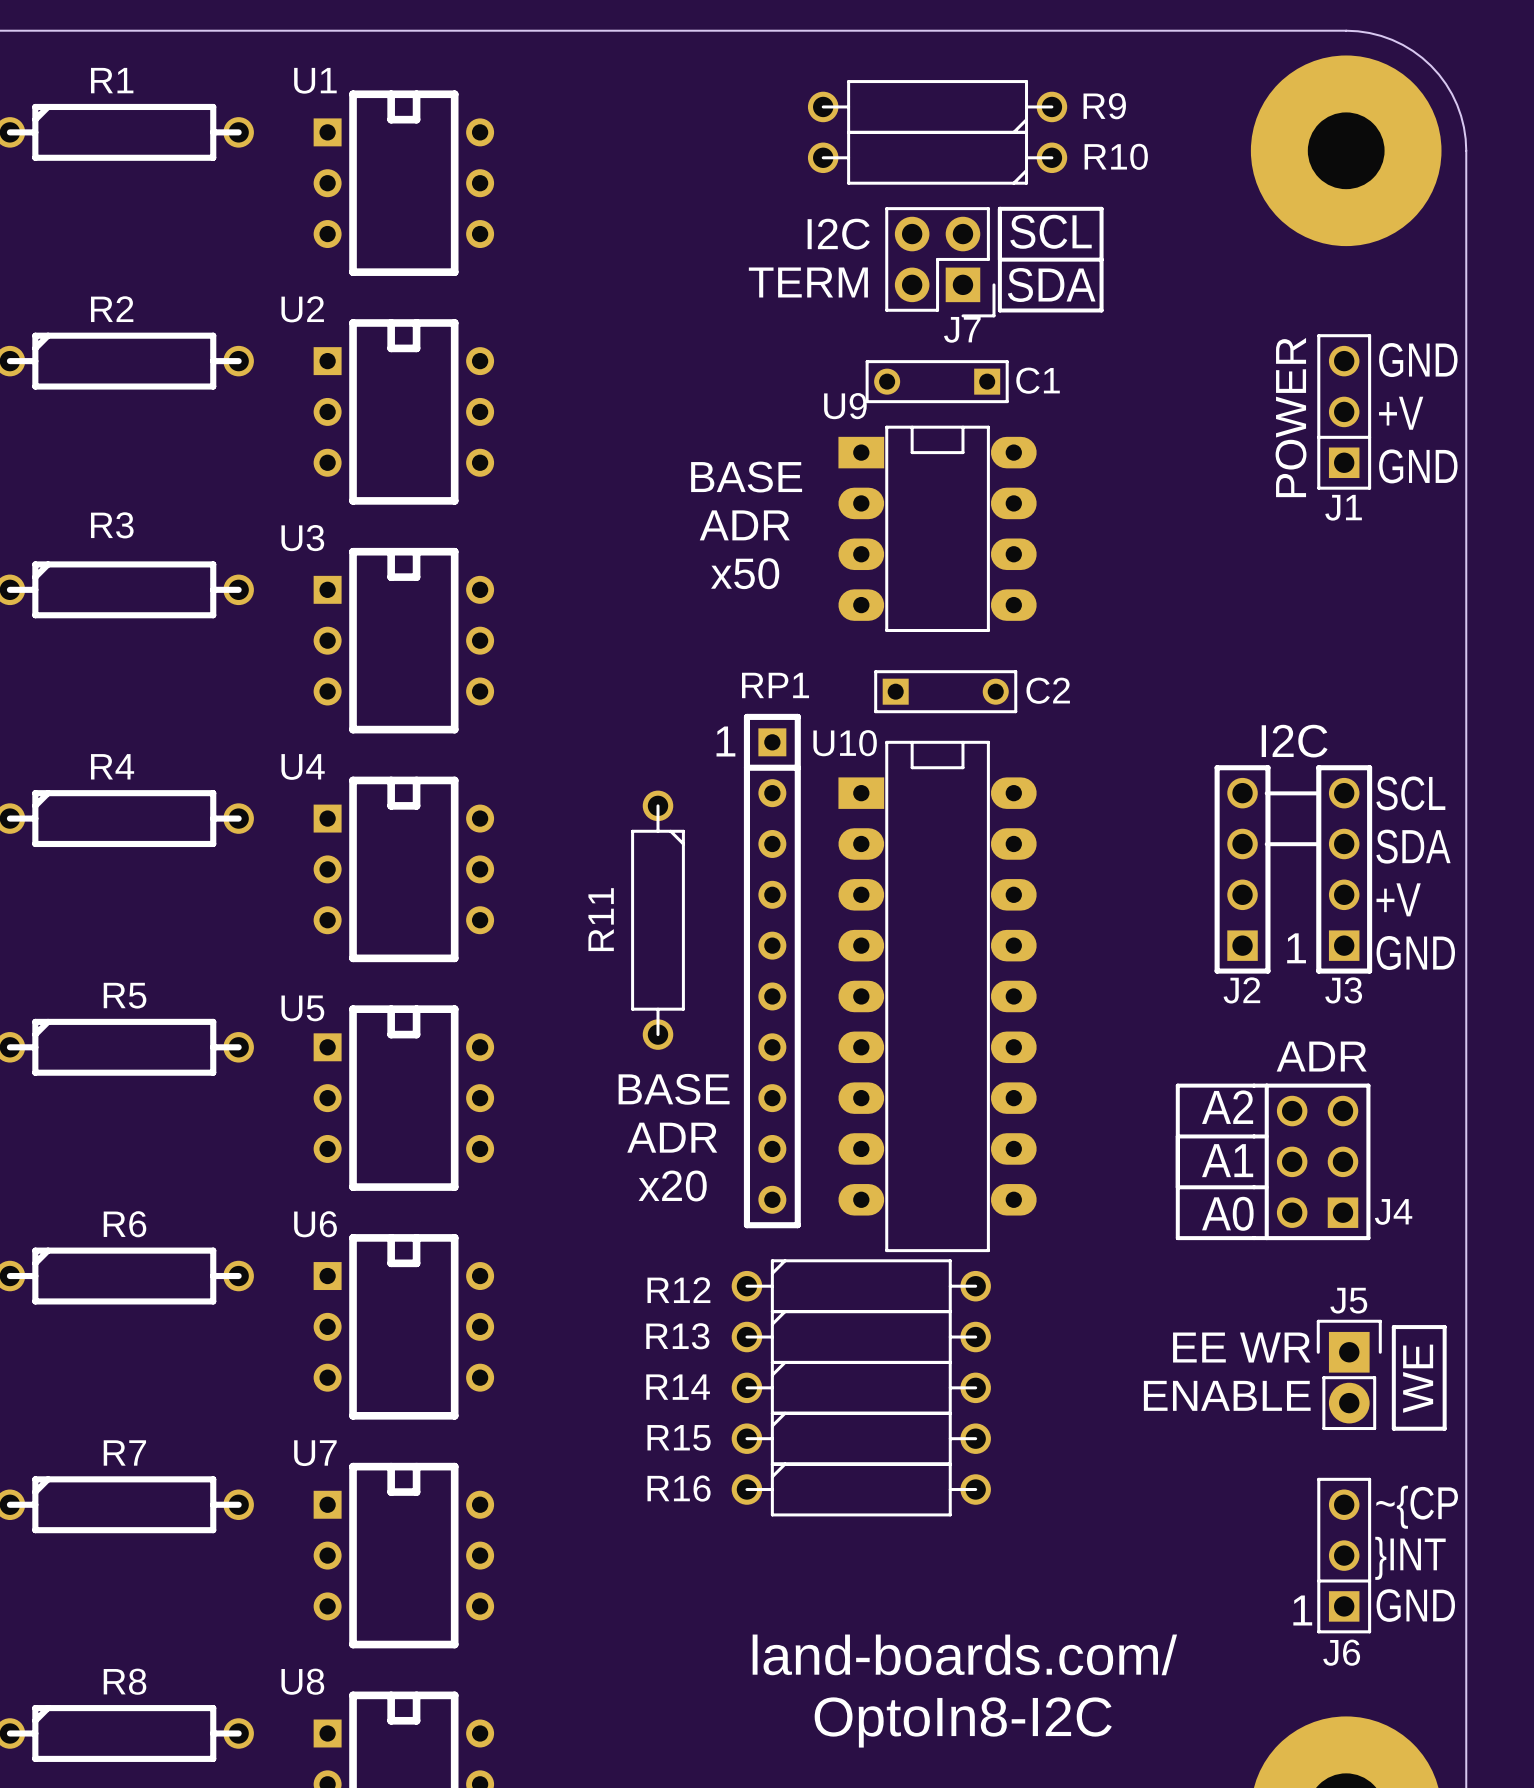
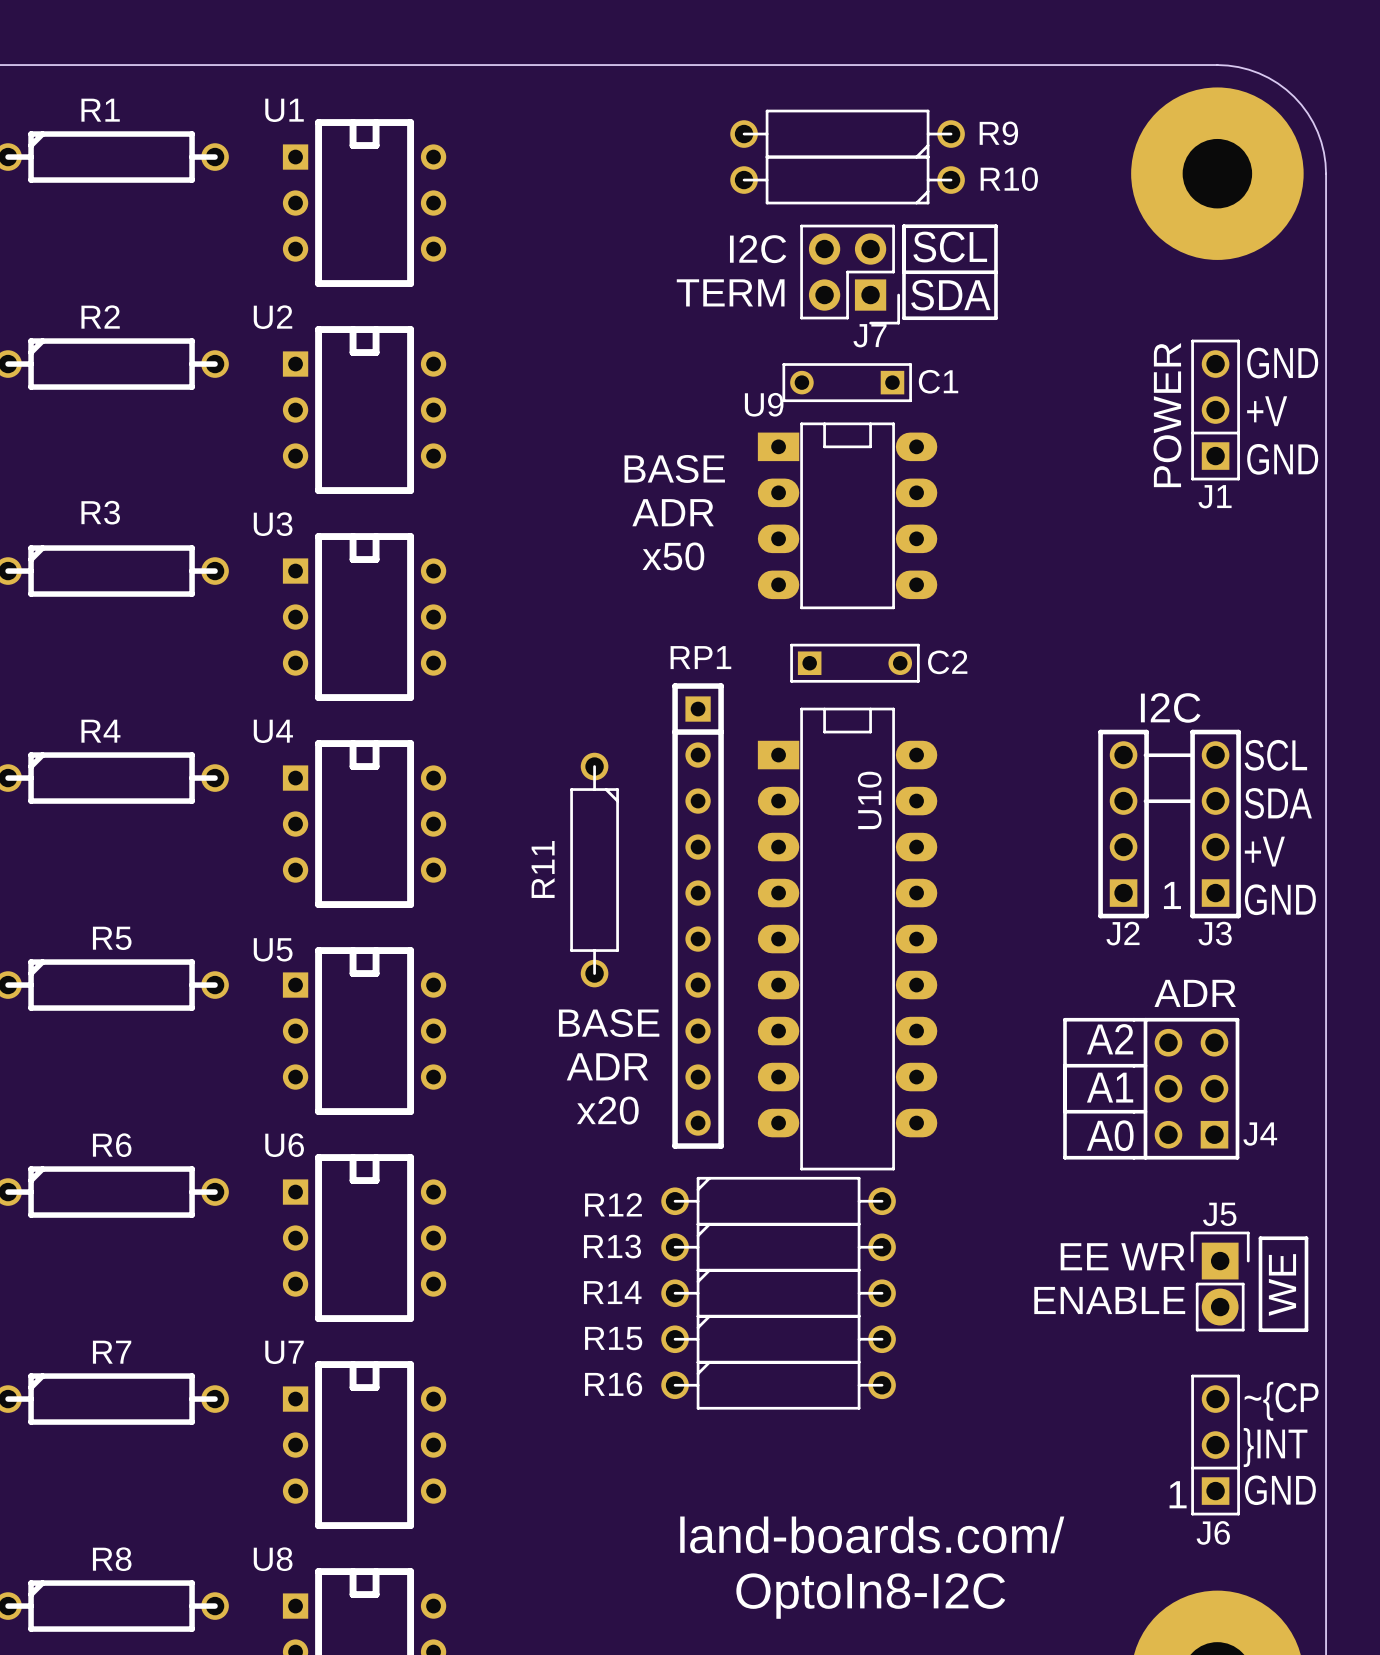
text: 1 (725, 741) -> none
U10 name rotation: 0° (845, 743) -> 90° counterclockwise (869, 800)
U10 name position: U10 (845, 743) -> U10 (869, 800)

